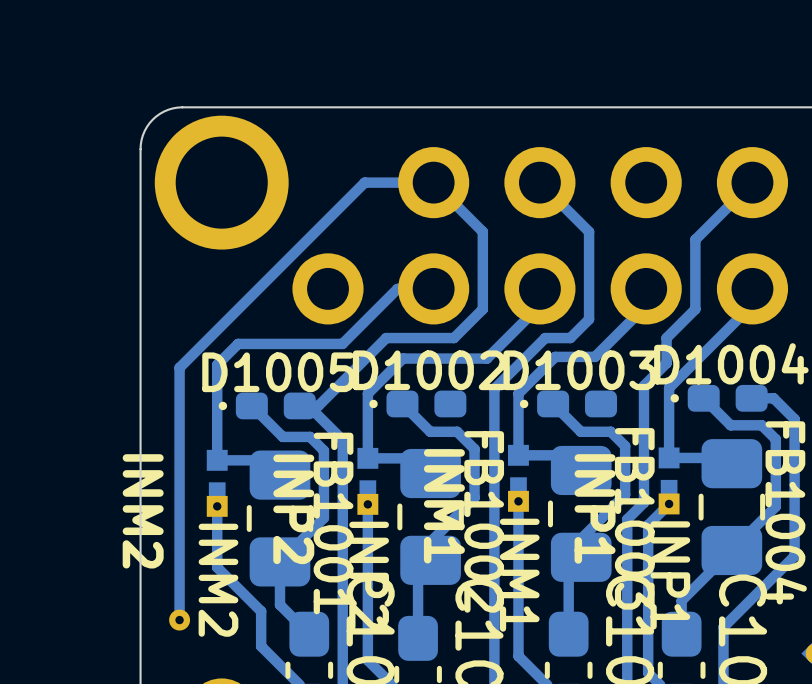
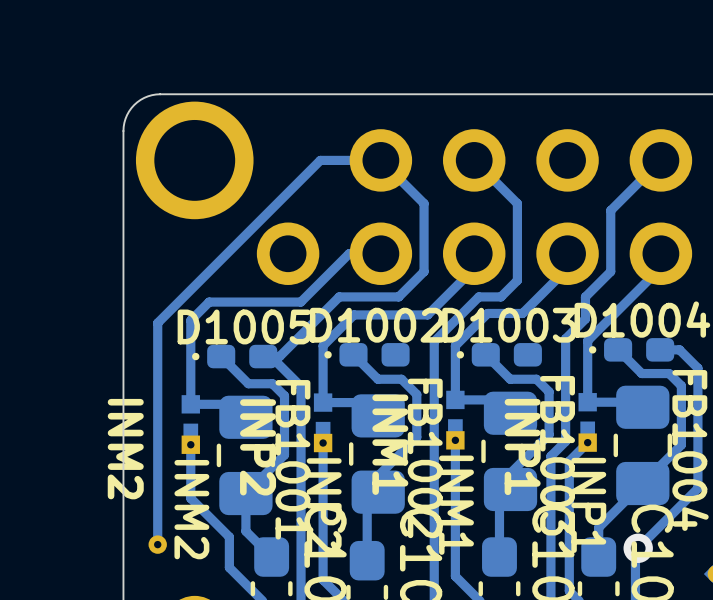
via: none -> (638, 548)

